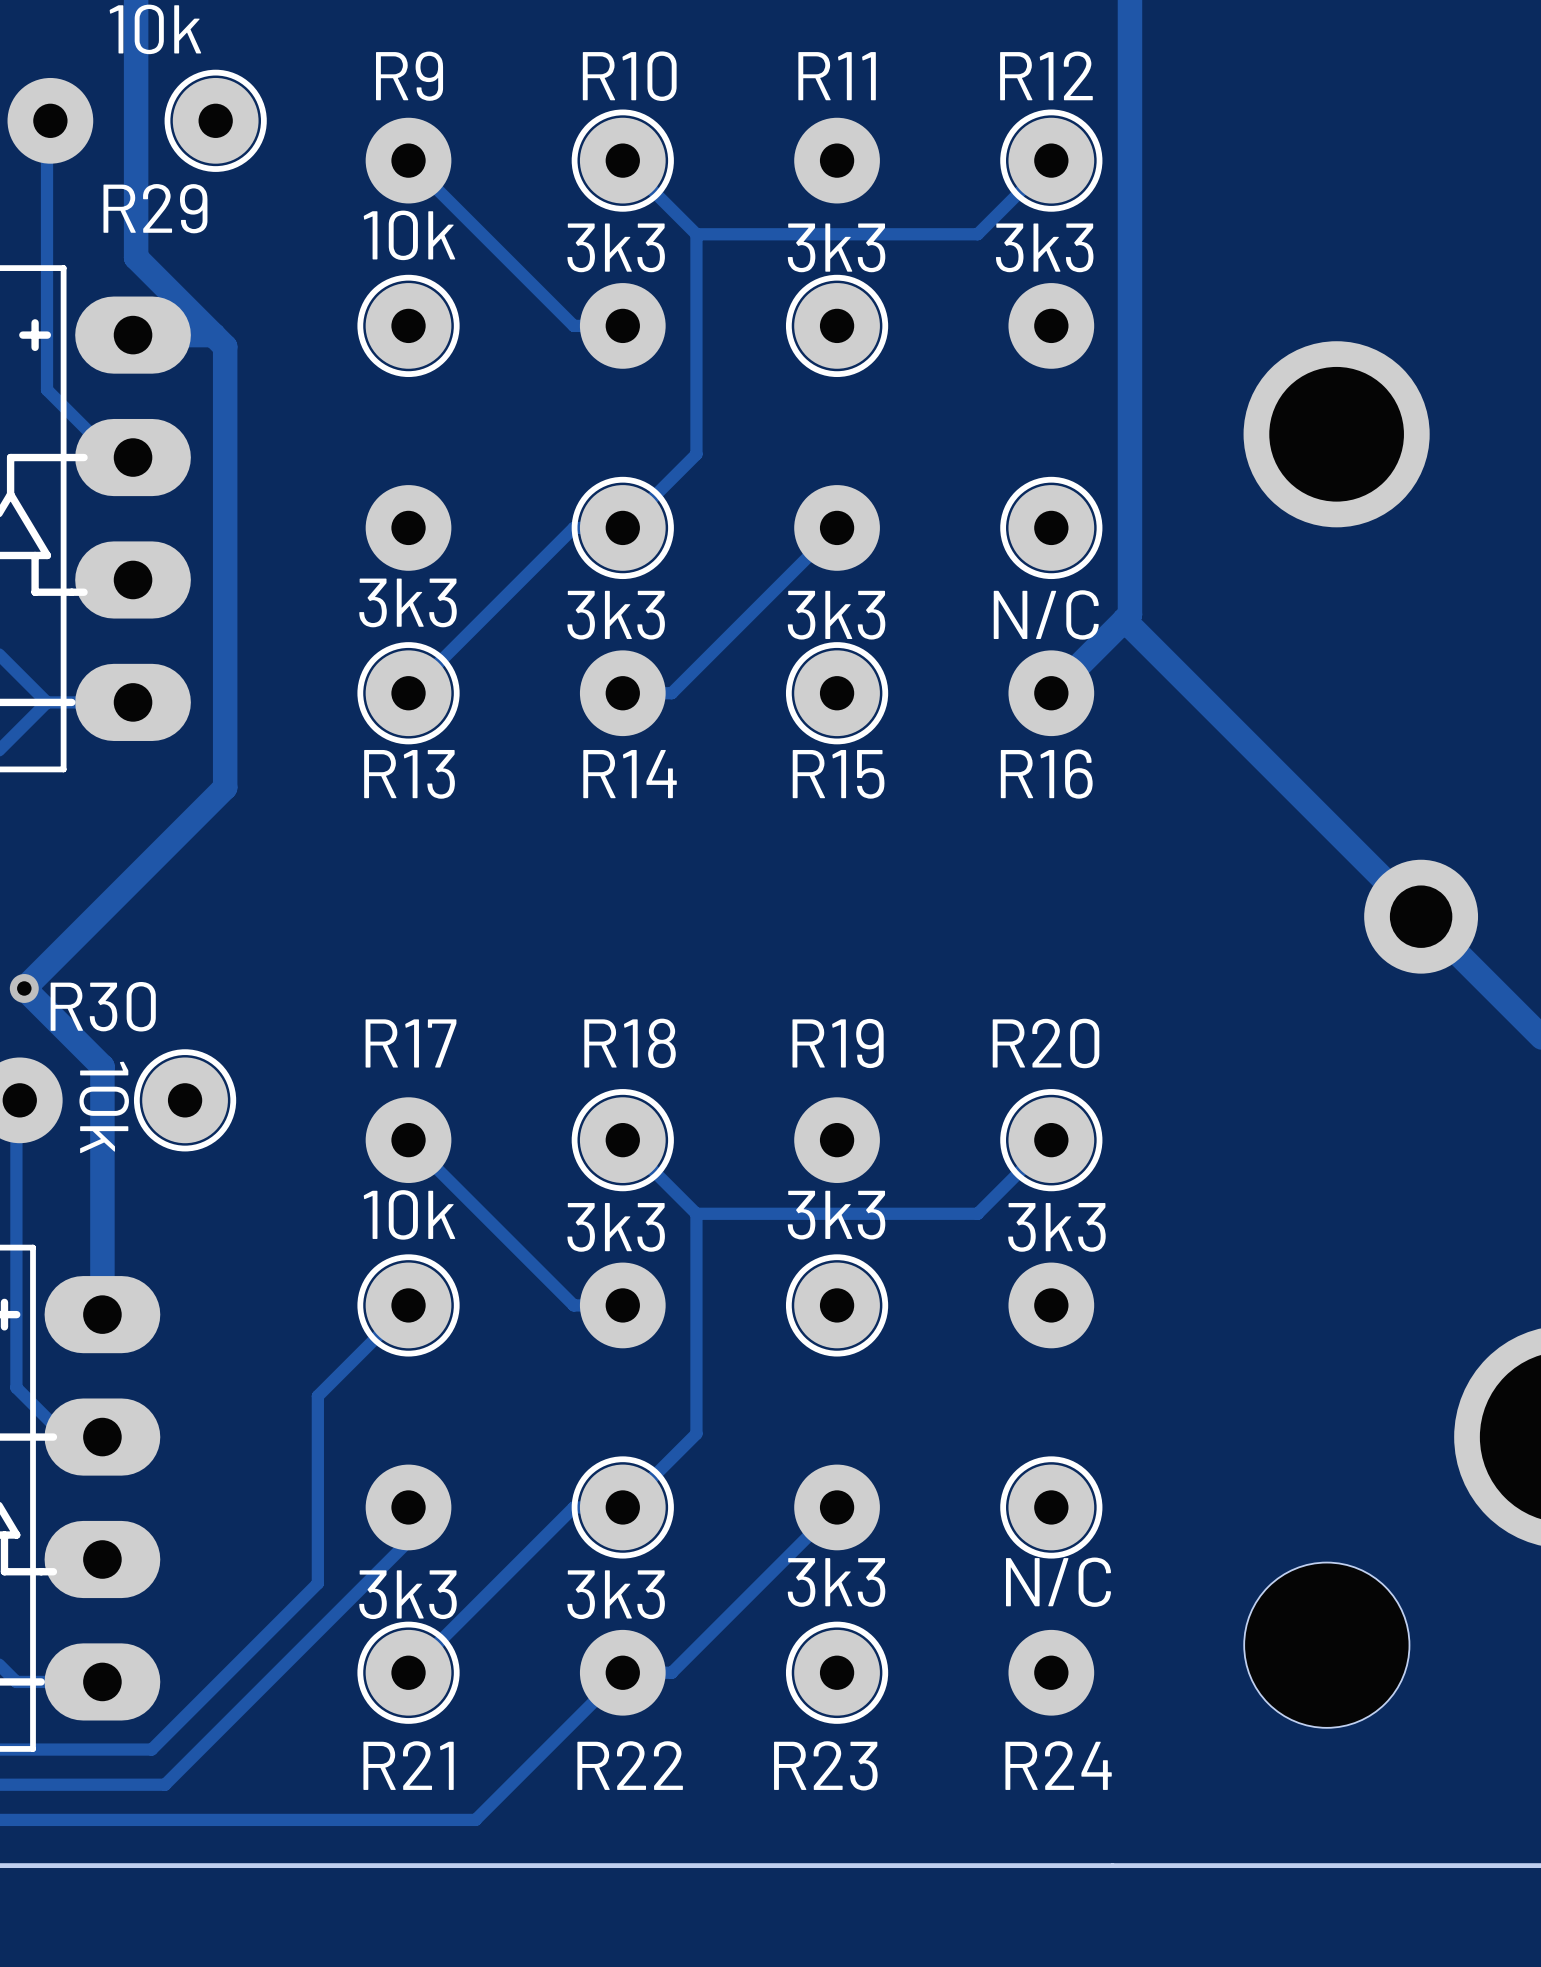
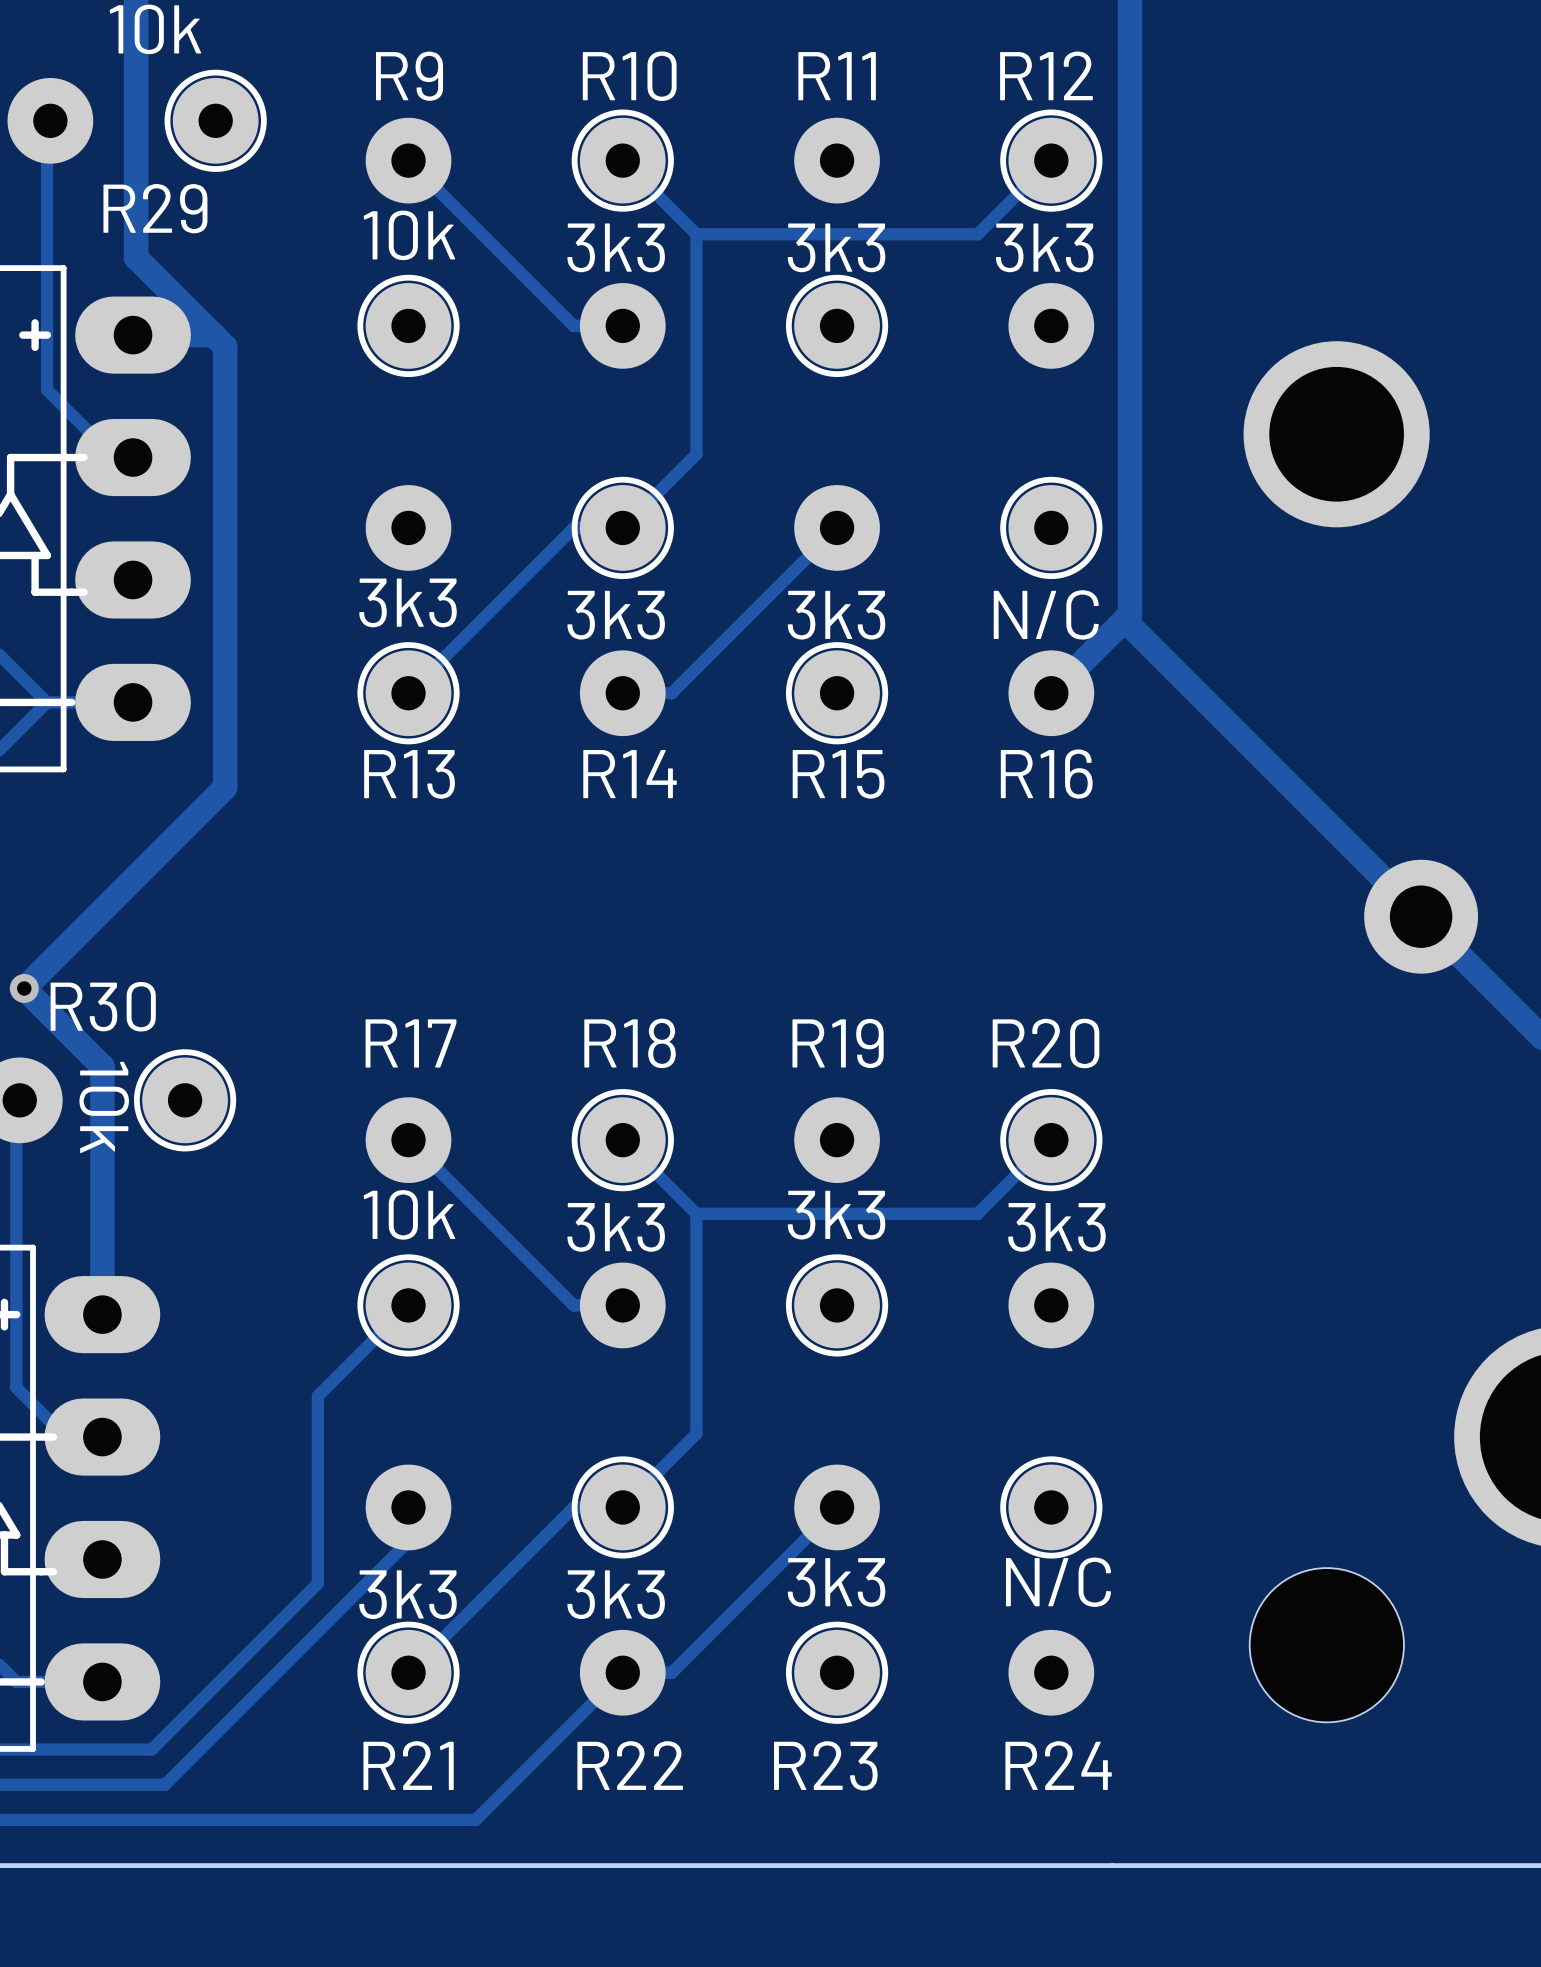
part footprint: [1244, 1562, 1410, 1728] -> [1249, 1568, 1404, 1723]

